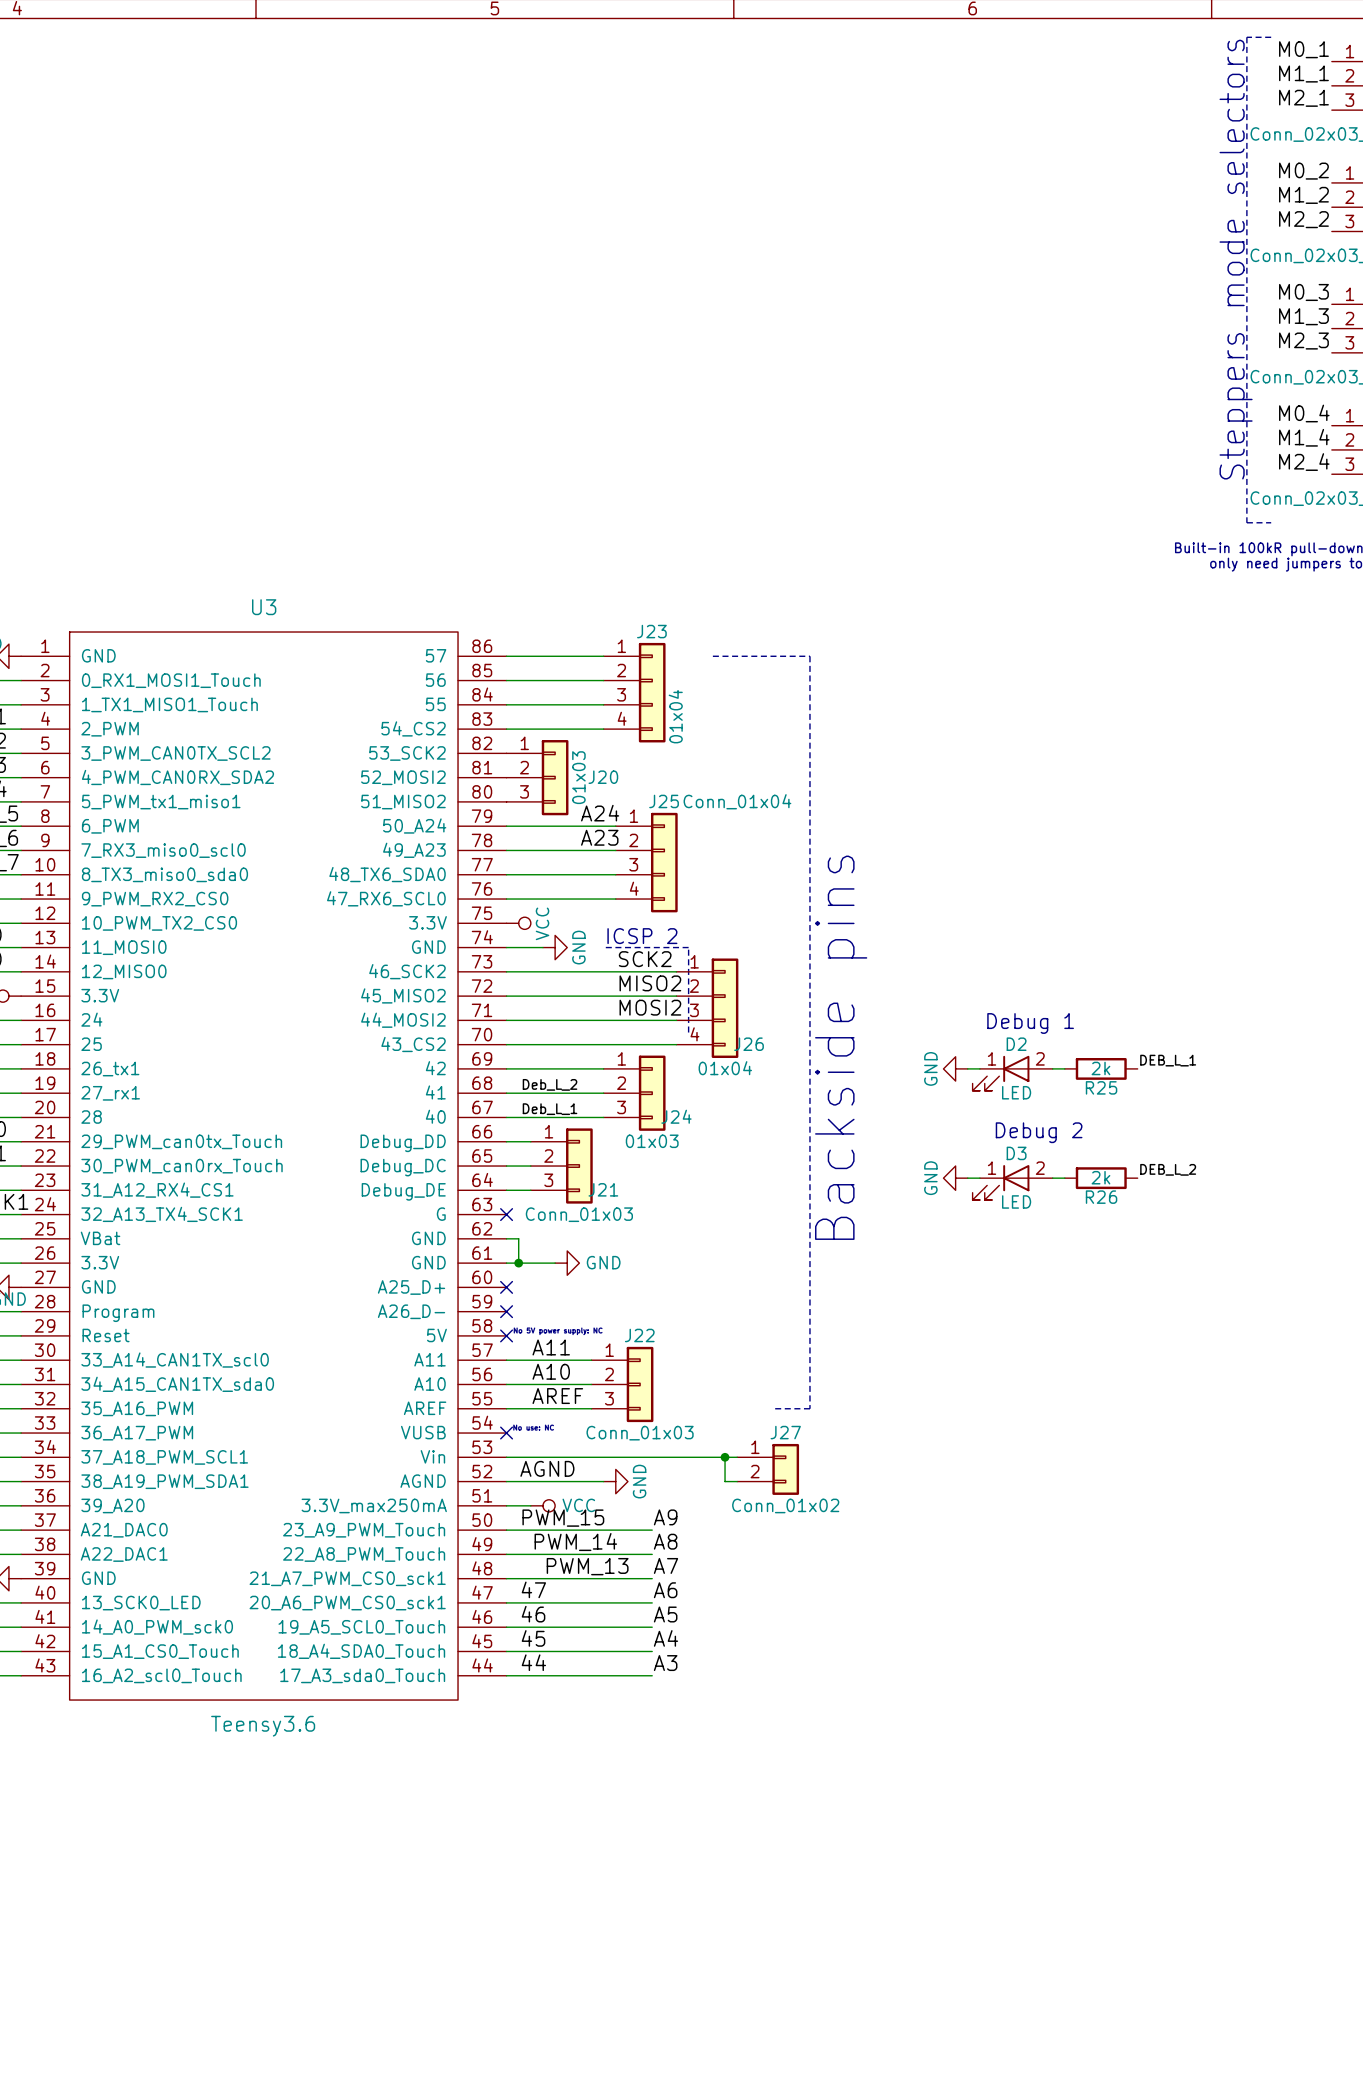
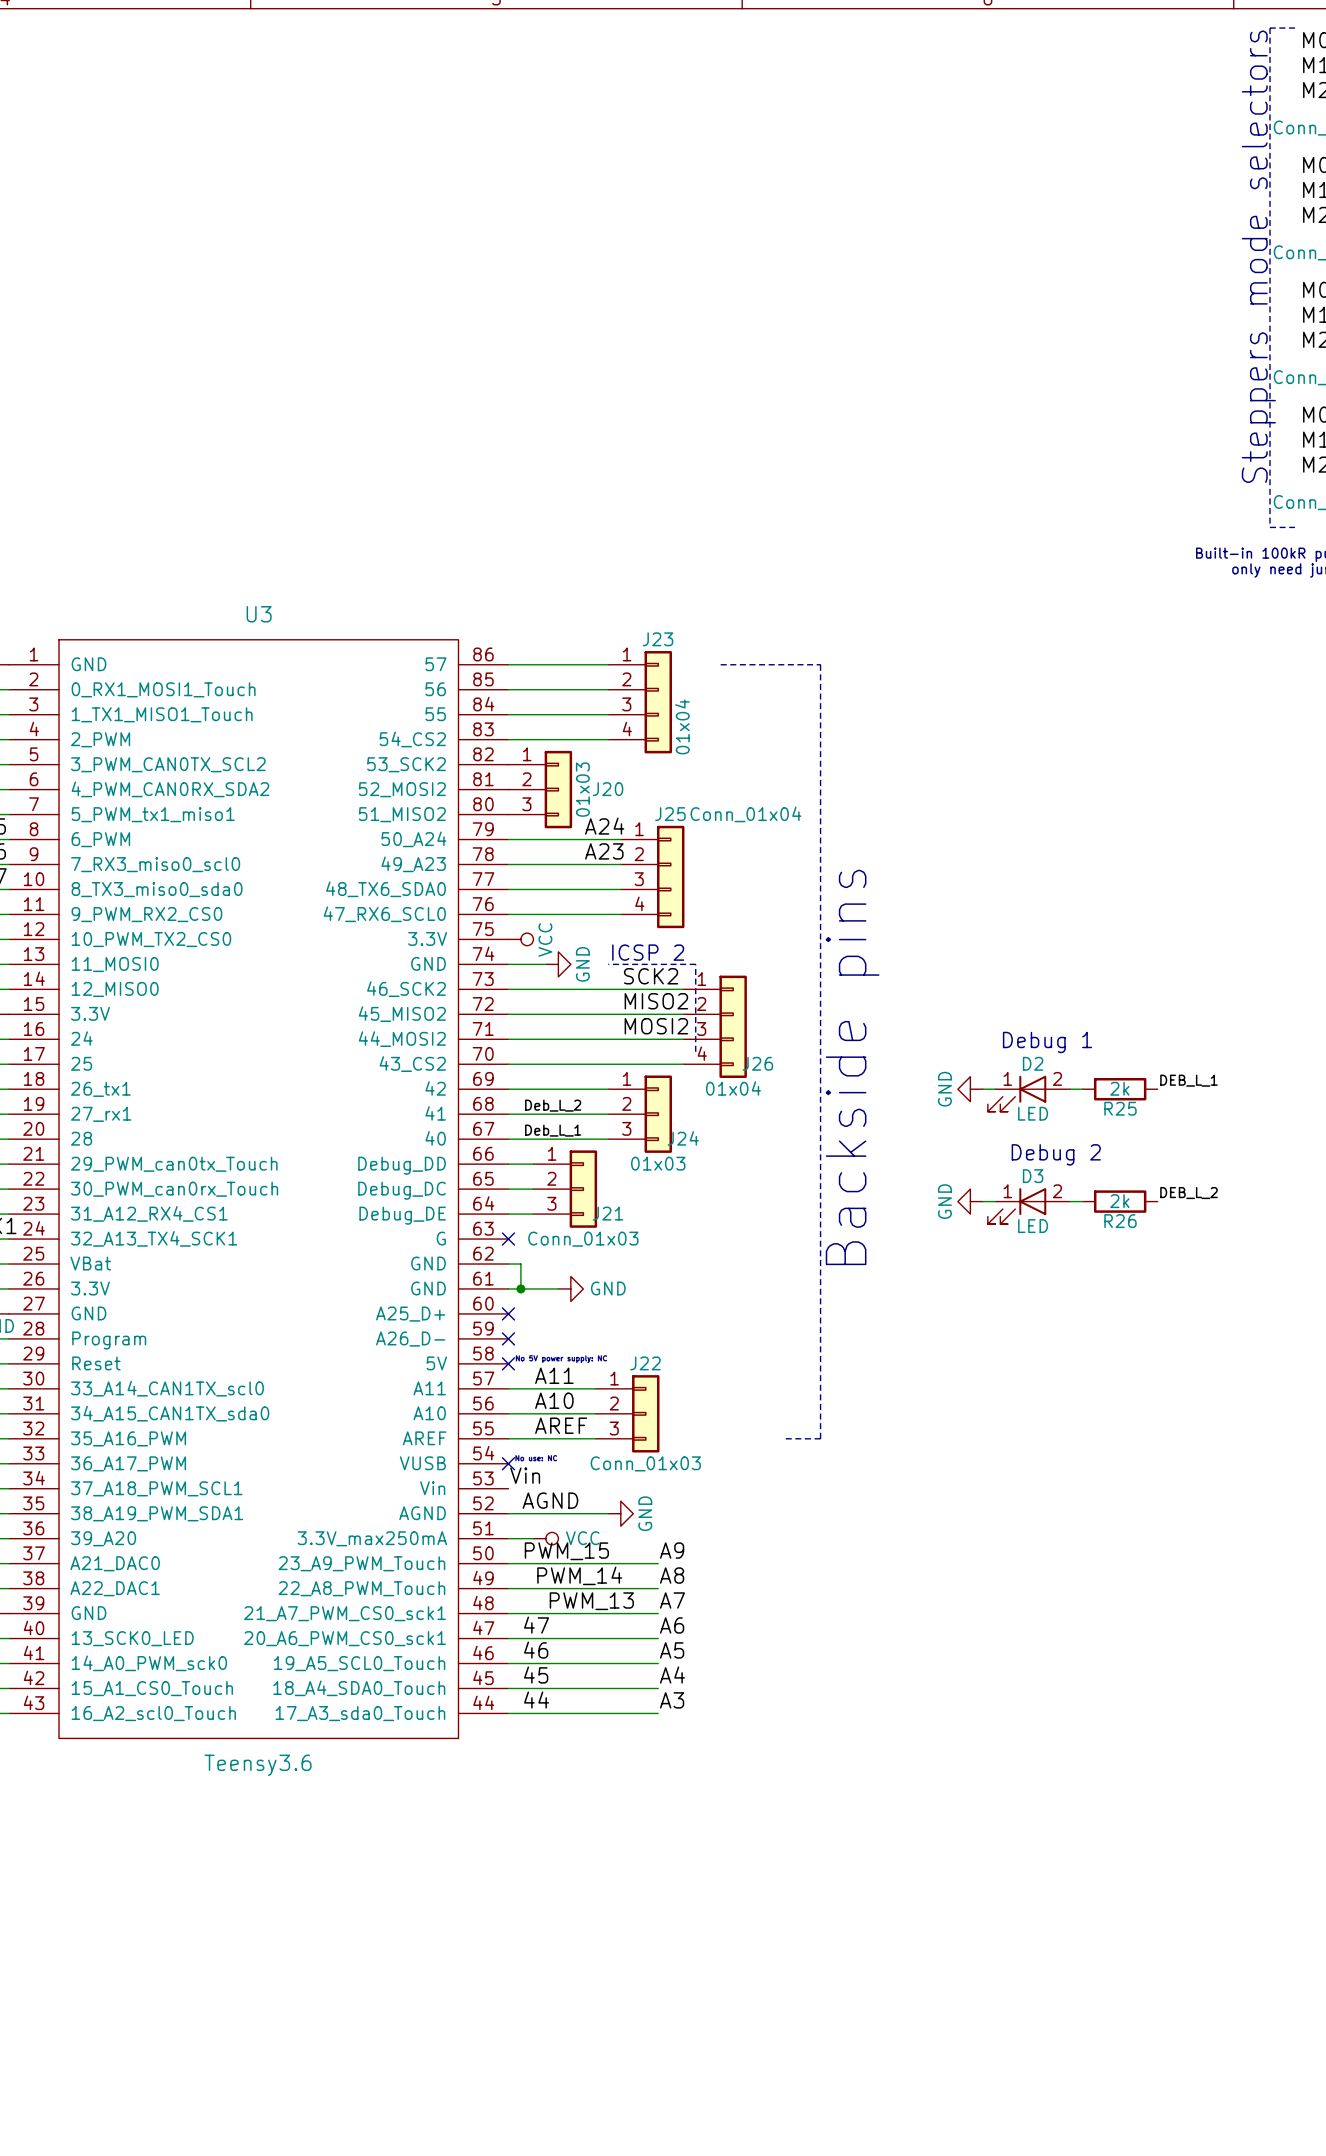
label: none -> Vin (525, 1475)
wire: (506, 1457) (737, 1457) -> none
wire: (725, 1457) (725, 1481) (737, 1481) -> none
junction: (725, 1457) -> none
J27: Conn_01x02 (768, 1469) -> none

